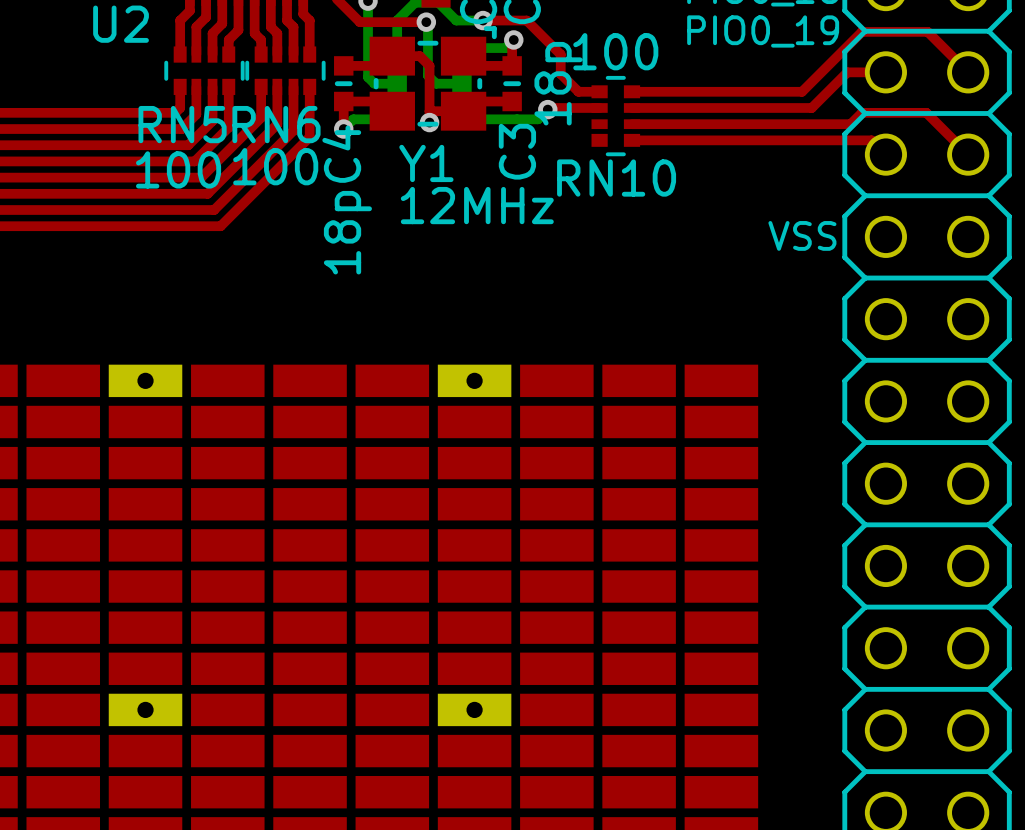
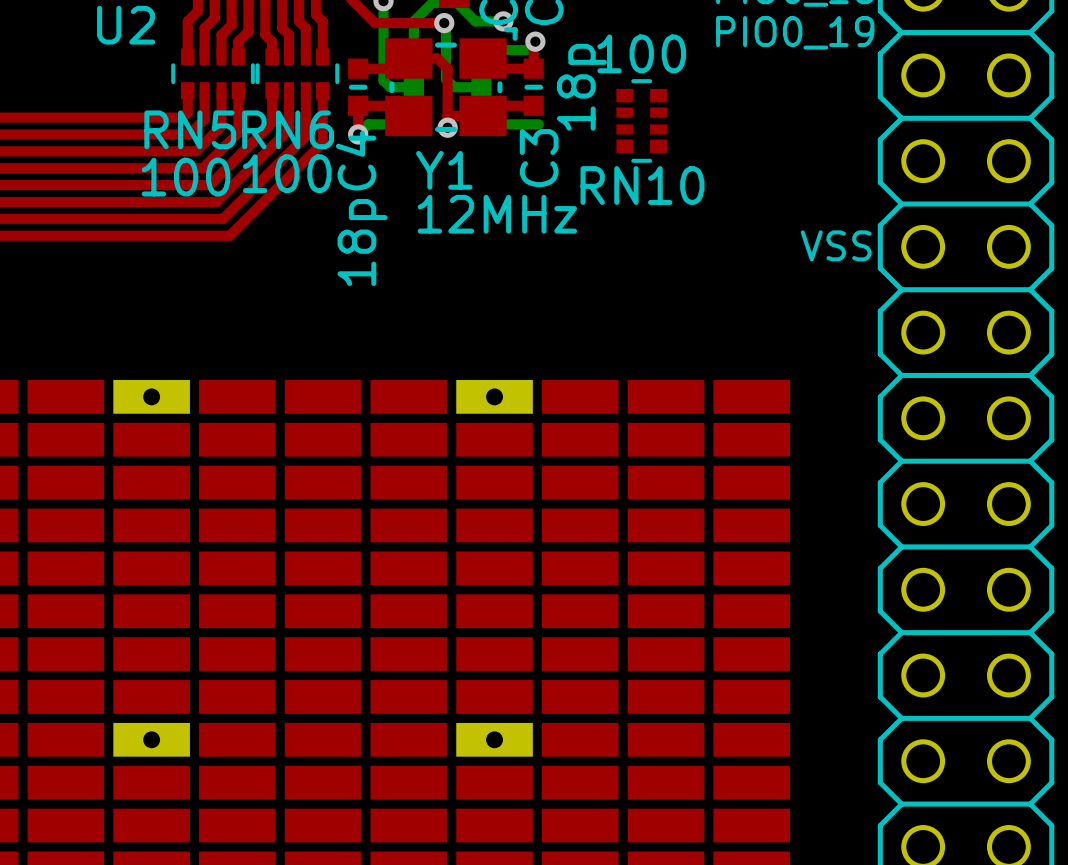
top track: (483, 20) (526, 20) (560, 54) (560, 73) (578, 91) (599, 91) -> none
top track: (885, 72) (847, 72) (811, 107) (631, 107) -> none
top track: (968, 72) (927, 31) (861, 31) (802, 91) (631, 91) -> none
top track: (599, 107) (549, 107) (547, 109) -> none
bottom track: (547, 109) (538, 119) (517, 119) -> none
via: (547, 109) -> none
top track: (631, 124) (850, 124) (861, 112) (926, 112) (968, 154) -> none
top track: (631, 140) (871, 140) (885, 154) -> none

